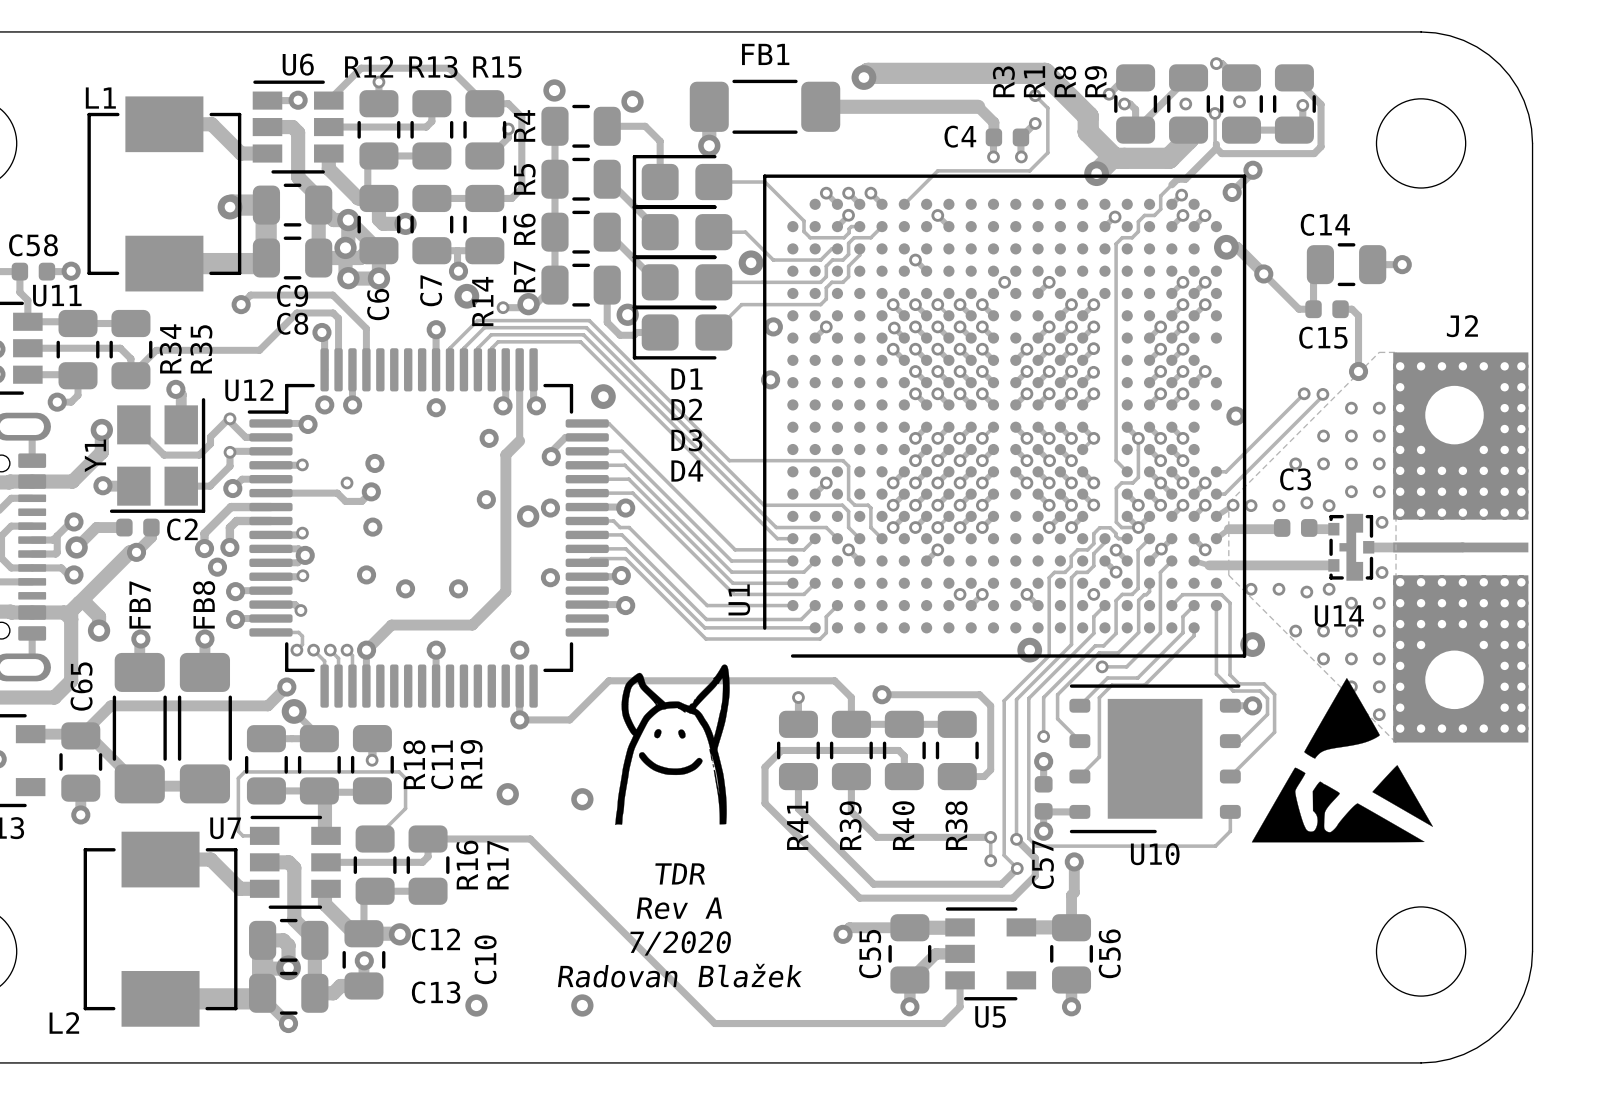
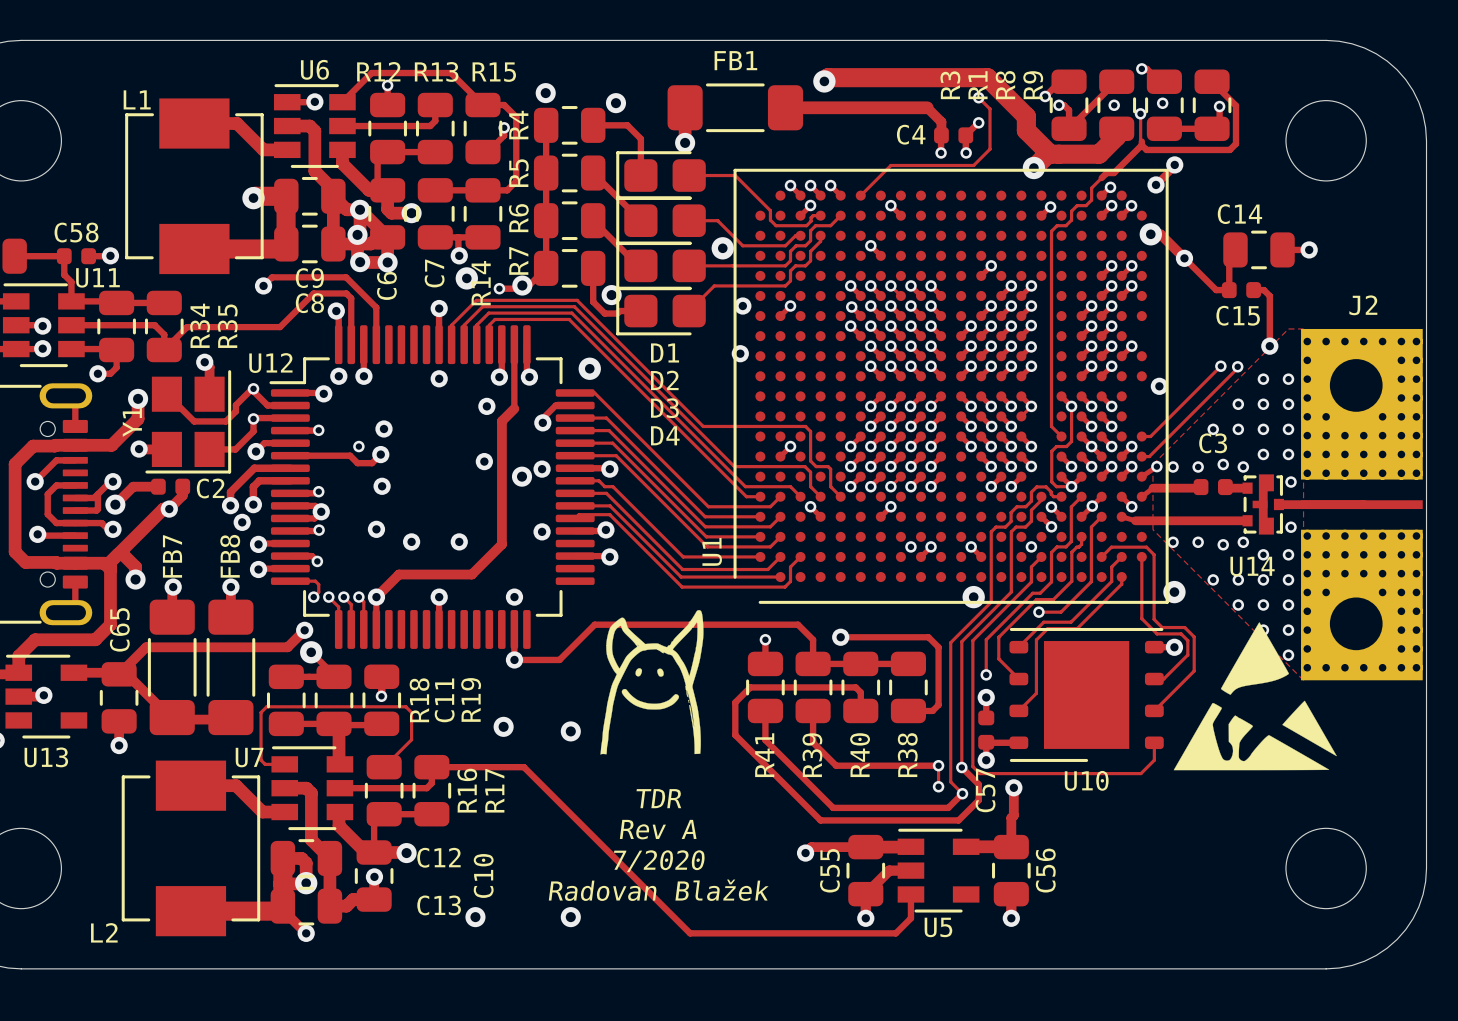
via: (1004, 282) -> none

